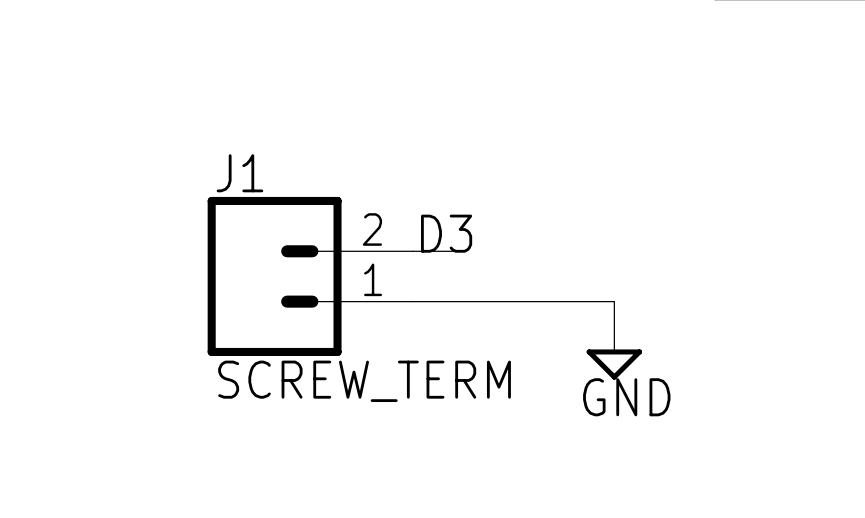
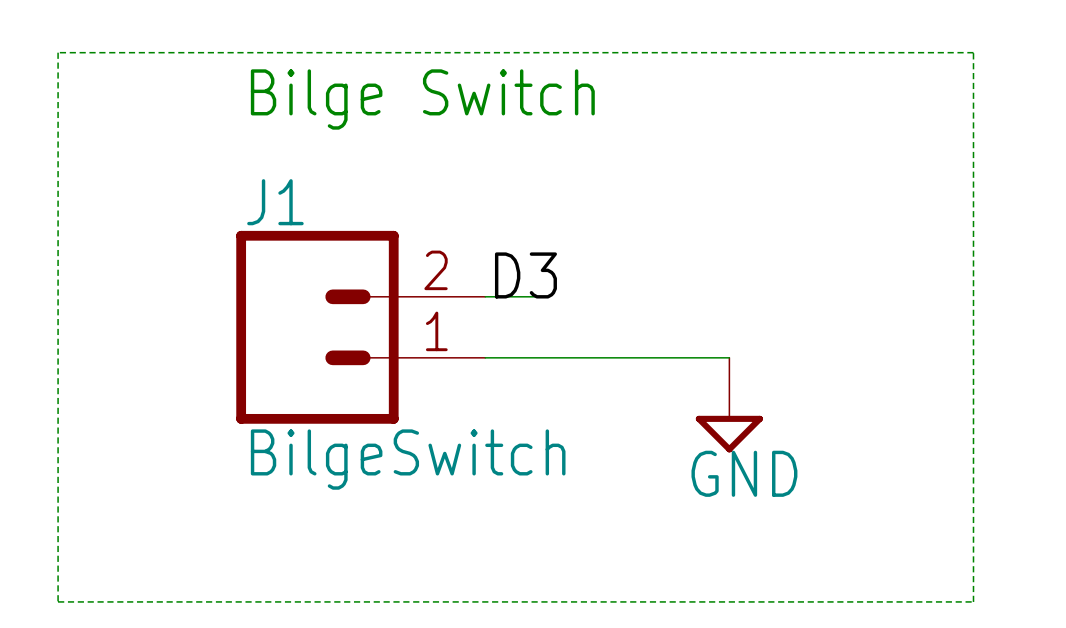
wire: none -> (58, 52) (58, 601) (973, 601) (973, 52) (58, 52)
text: none -> Bilge Switch (422, 99)
J1 value: SCREW_TERM (364, 381) -> BilgeSwitch (408, 459)

